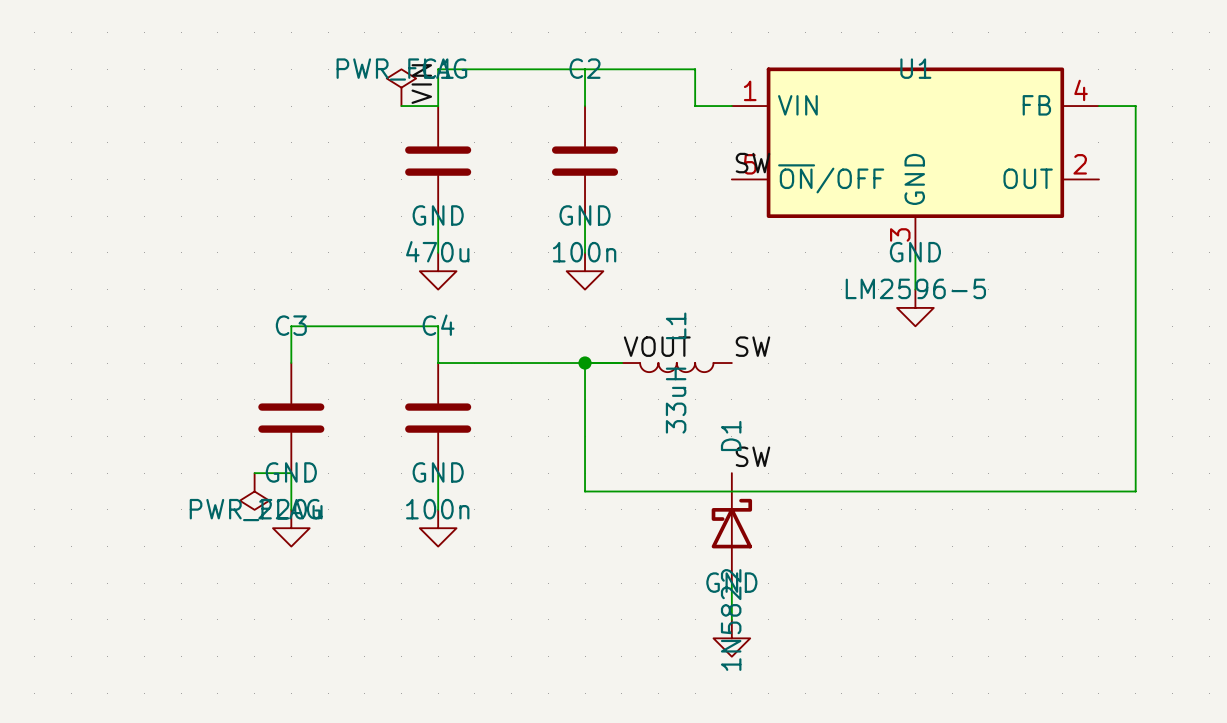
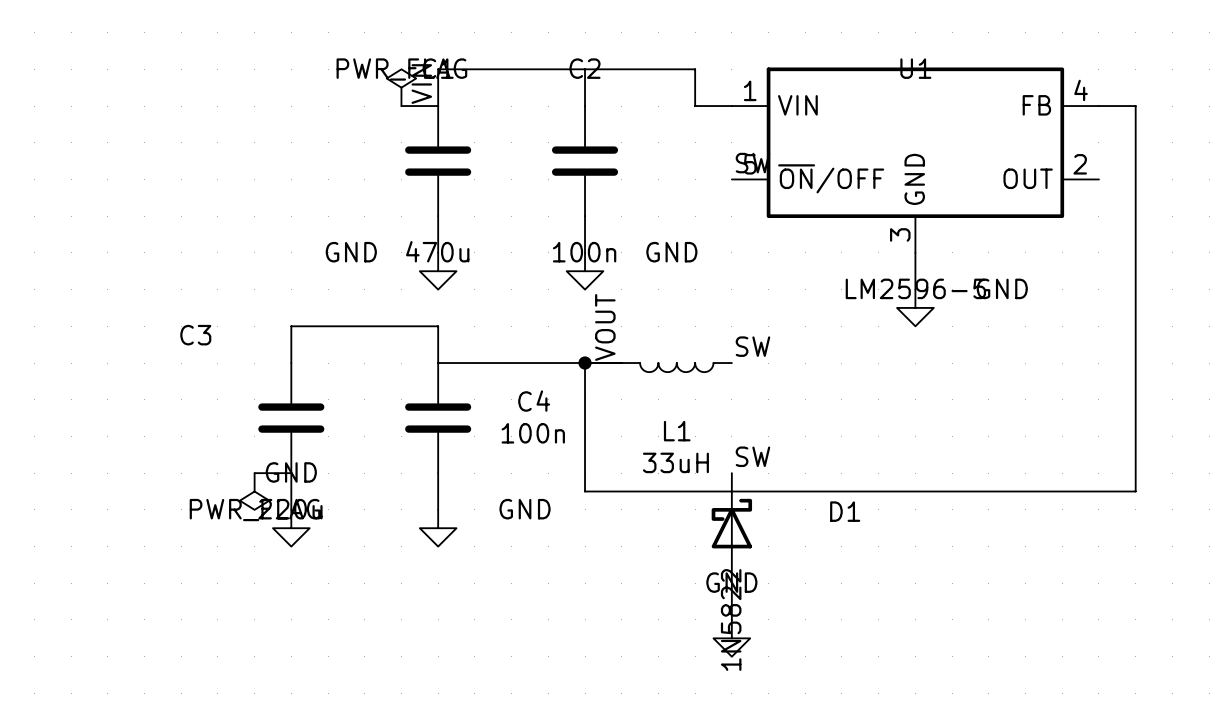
power symbol text position: GND (438, 215) -> GND (351, 252)
power symbol text position: GND (585, 215) -> GND (671, 252)
power symbol text position: GND (915, 252) -> GND (1002, 288)
C3 name position: C3 (291, 325) -> C3 (195, 335)
C4 name position: C4 (438, 325) -> C4 (534, 401)
L1 name rotation: 0° (676, 325) -> 90° clockwise (677, 431)
L1 name position: L1 (676, 325) -> L1 (677, 431)
label rotation: 0° (657, 346) -> 90° counterclockwise (605, 327)
L1 value rotation: 0° (676, 400) -> 90° clockwise (675, 462)
D1 name rotation: 0° (731, 435) -> 90° clockwise (845, 511)
D1 name position: D1 (731, 435) -> D1 (845, 511)
power symbol text position: GND (438, 472) -> GND (525, 509)
C4 value position: 100n (437, 509) -> 100n (533, 433)

